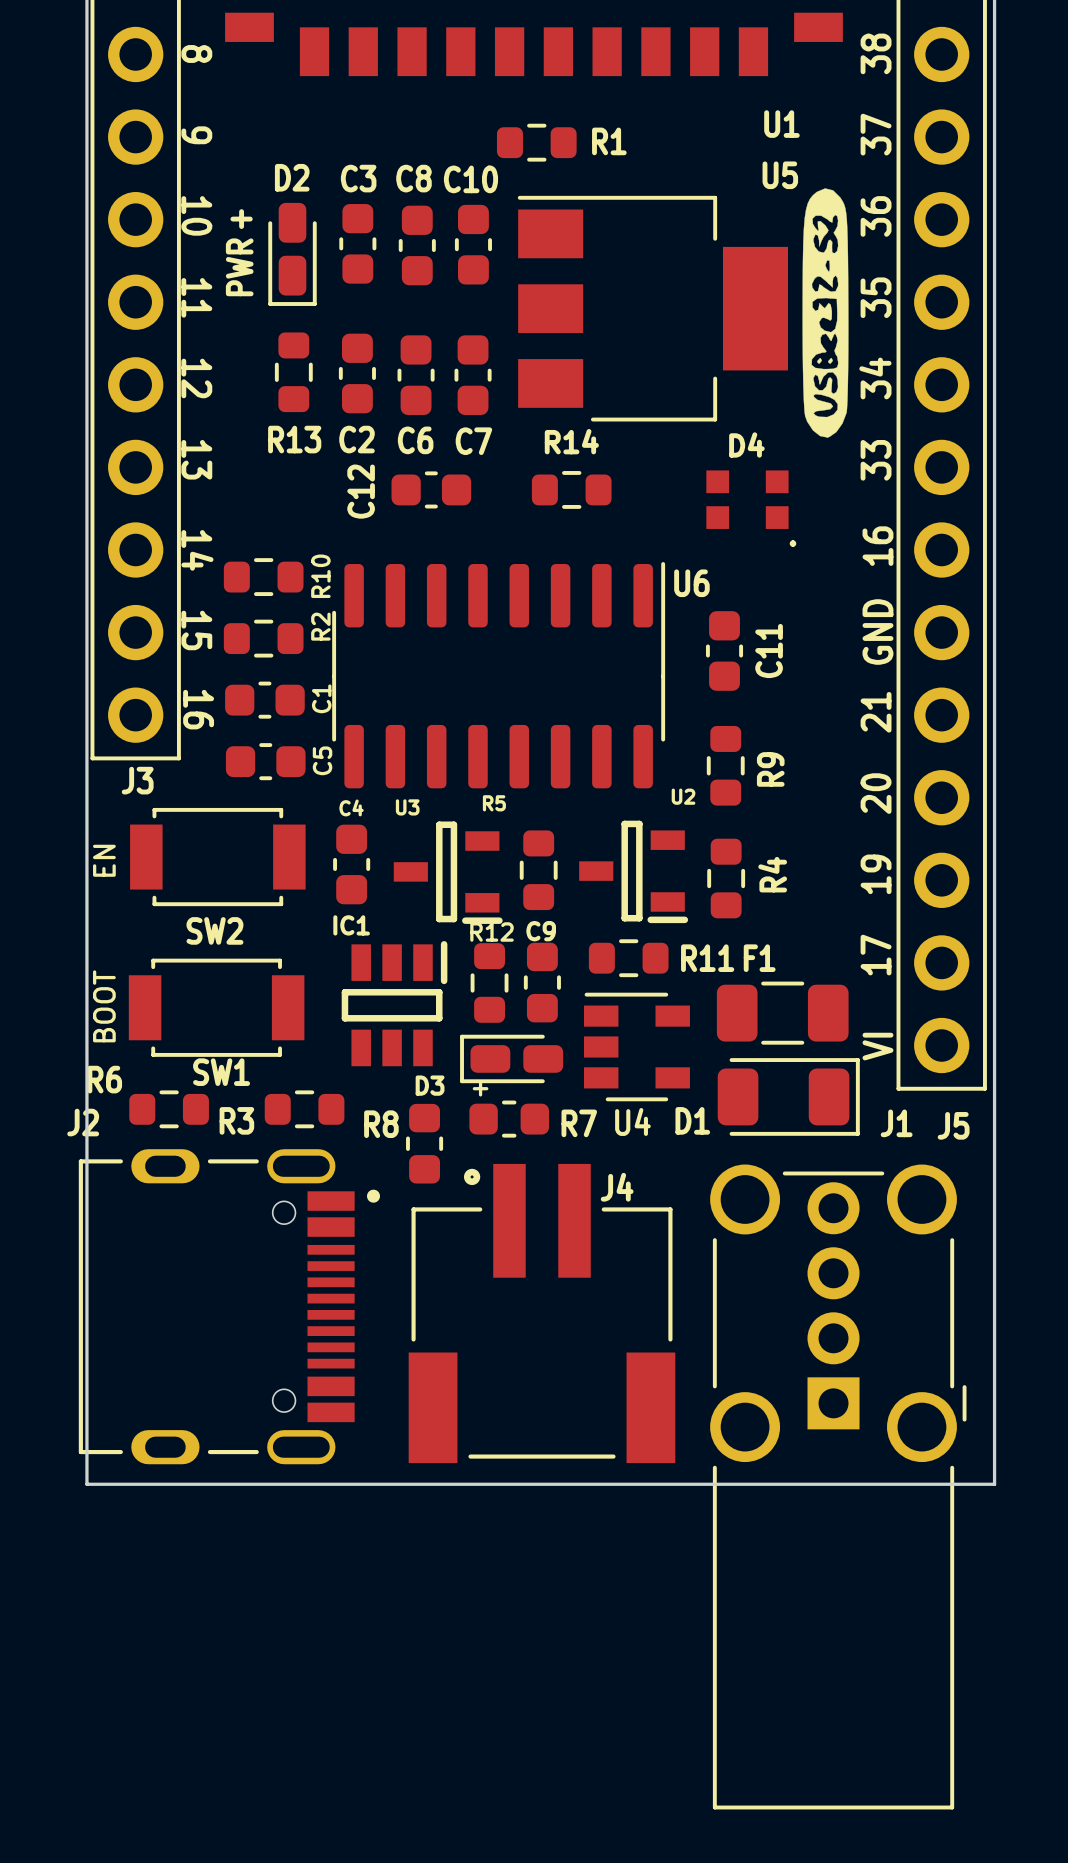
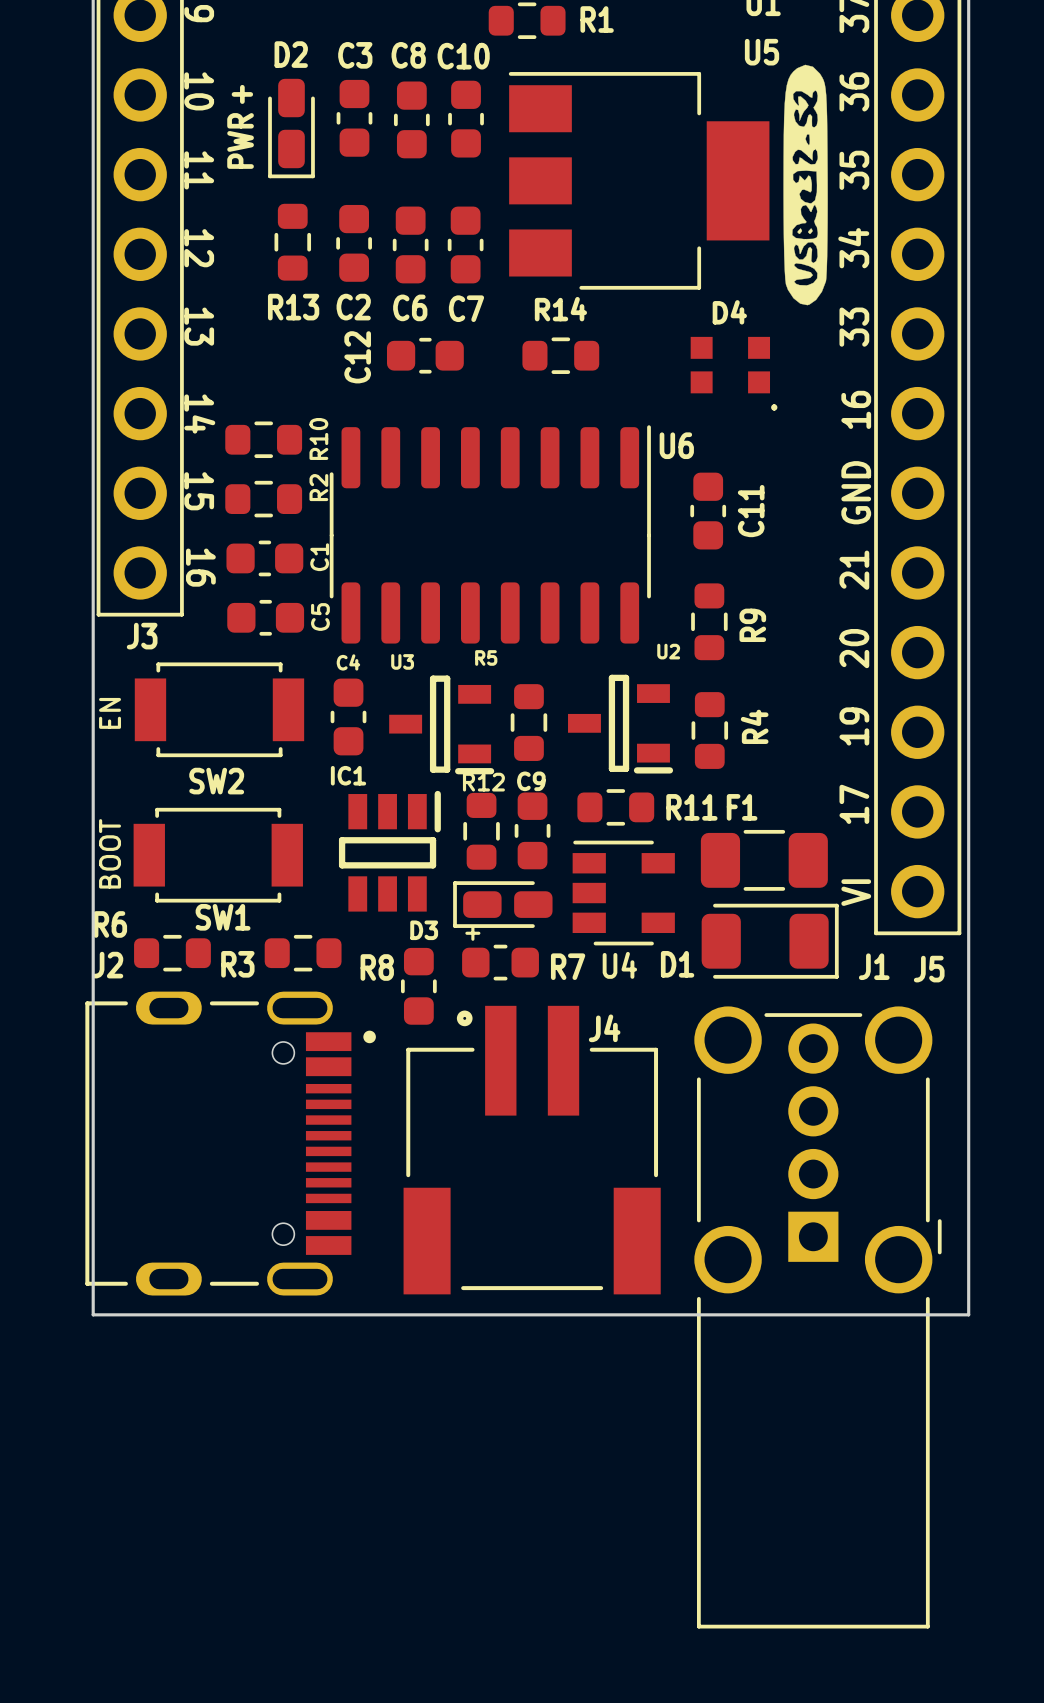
J2 name position: J2 (83, 1122) -> J2 (107, 965)

